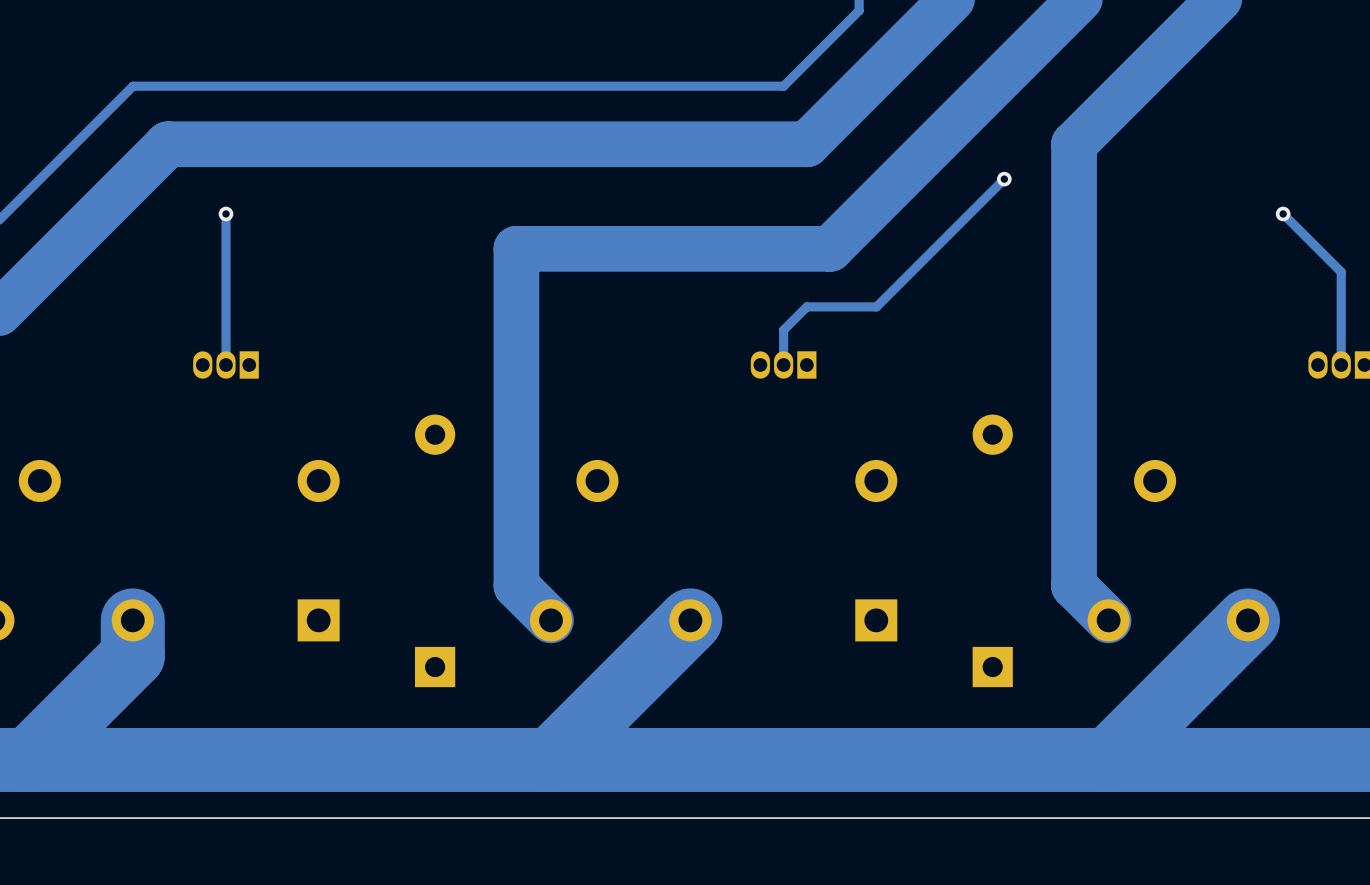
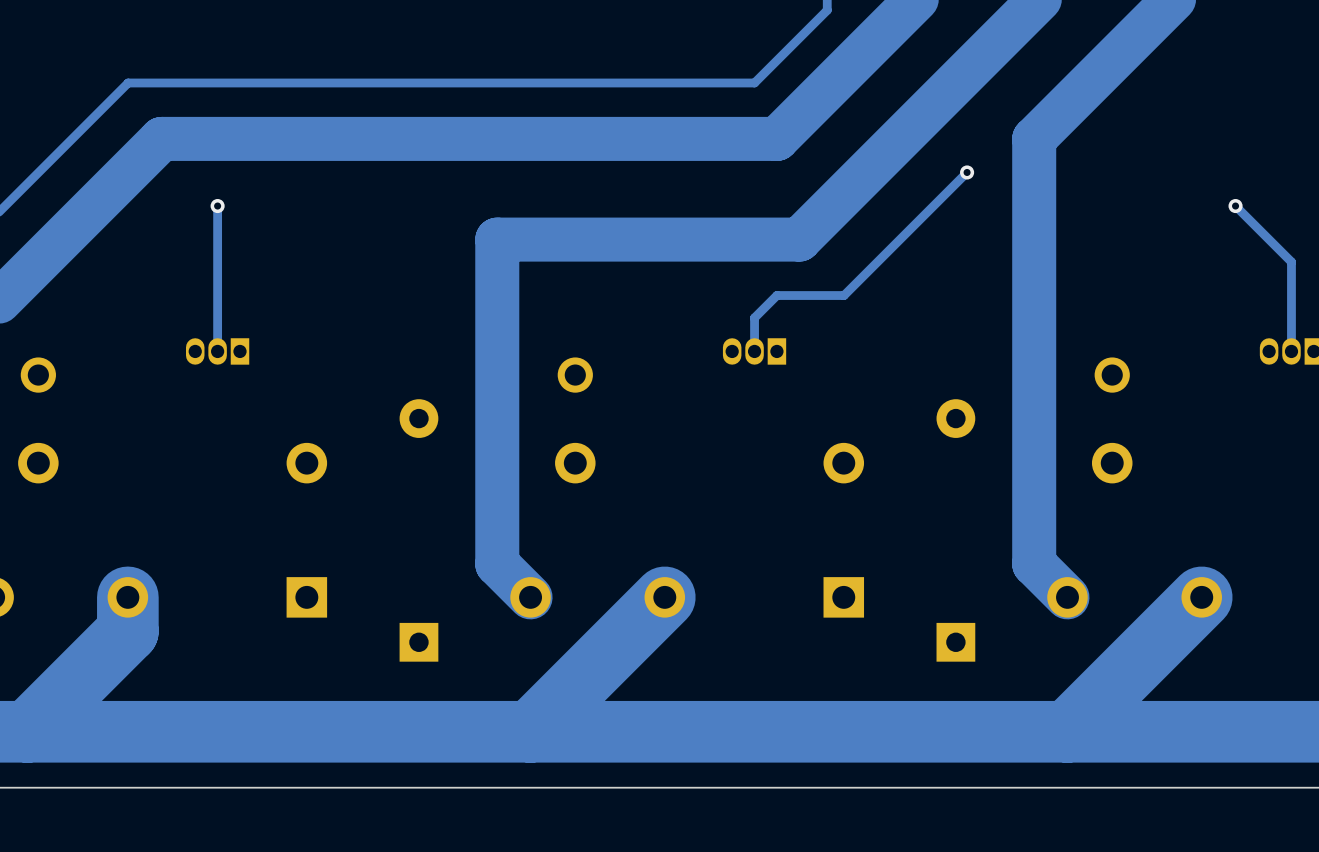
part: none -> (38, 375)
part: none -> (575, 375)
part: none -> (1112, 375)

